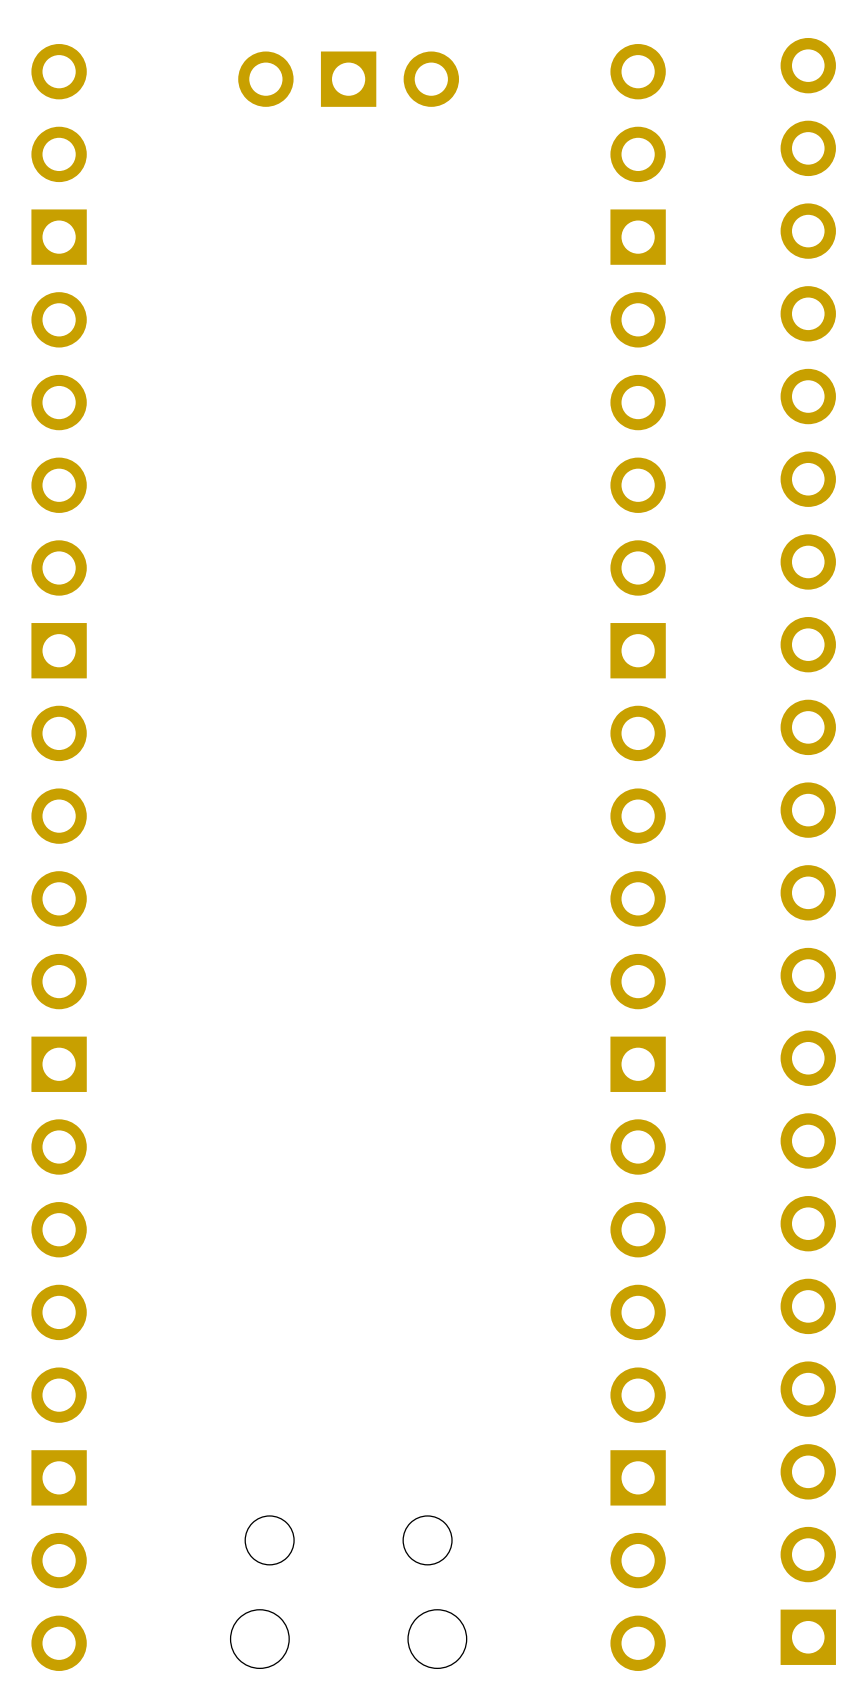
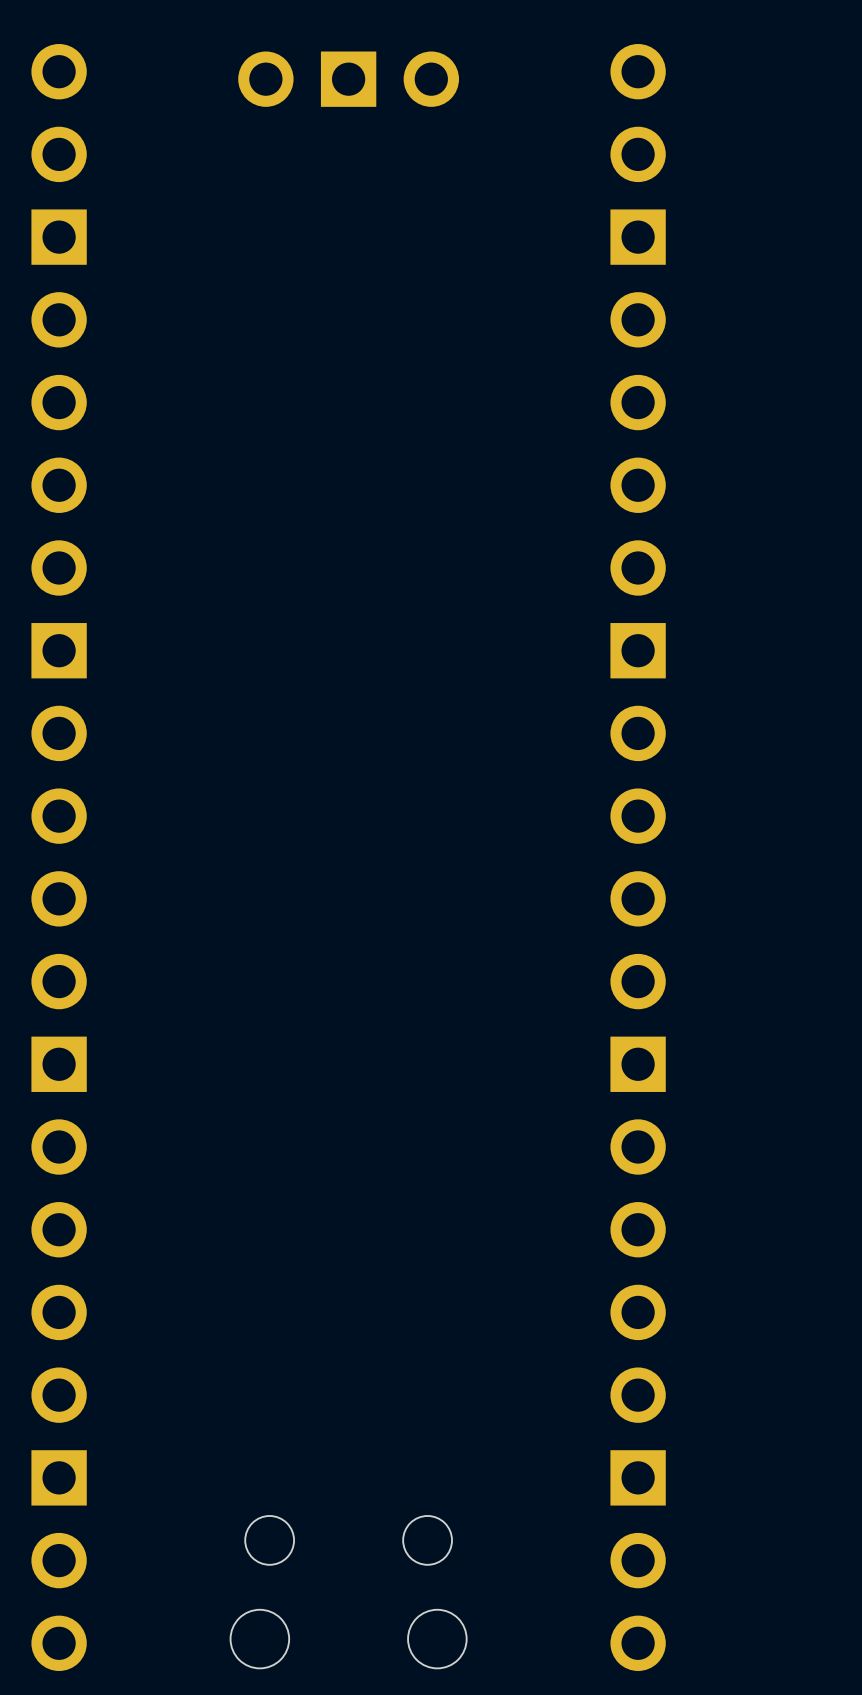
part: (808, 851) -> none

